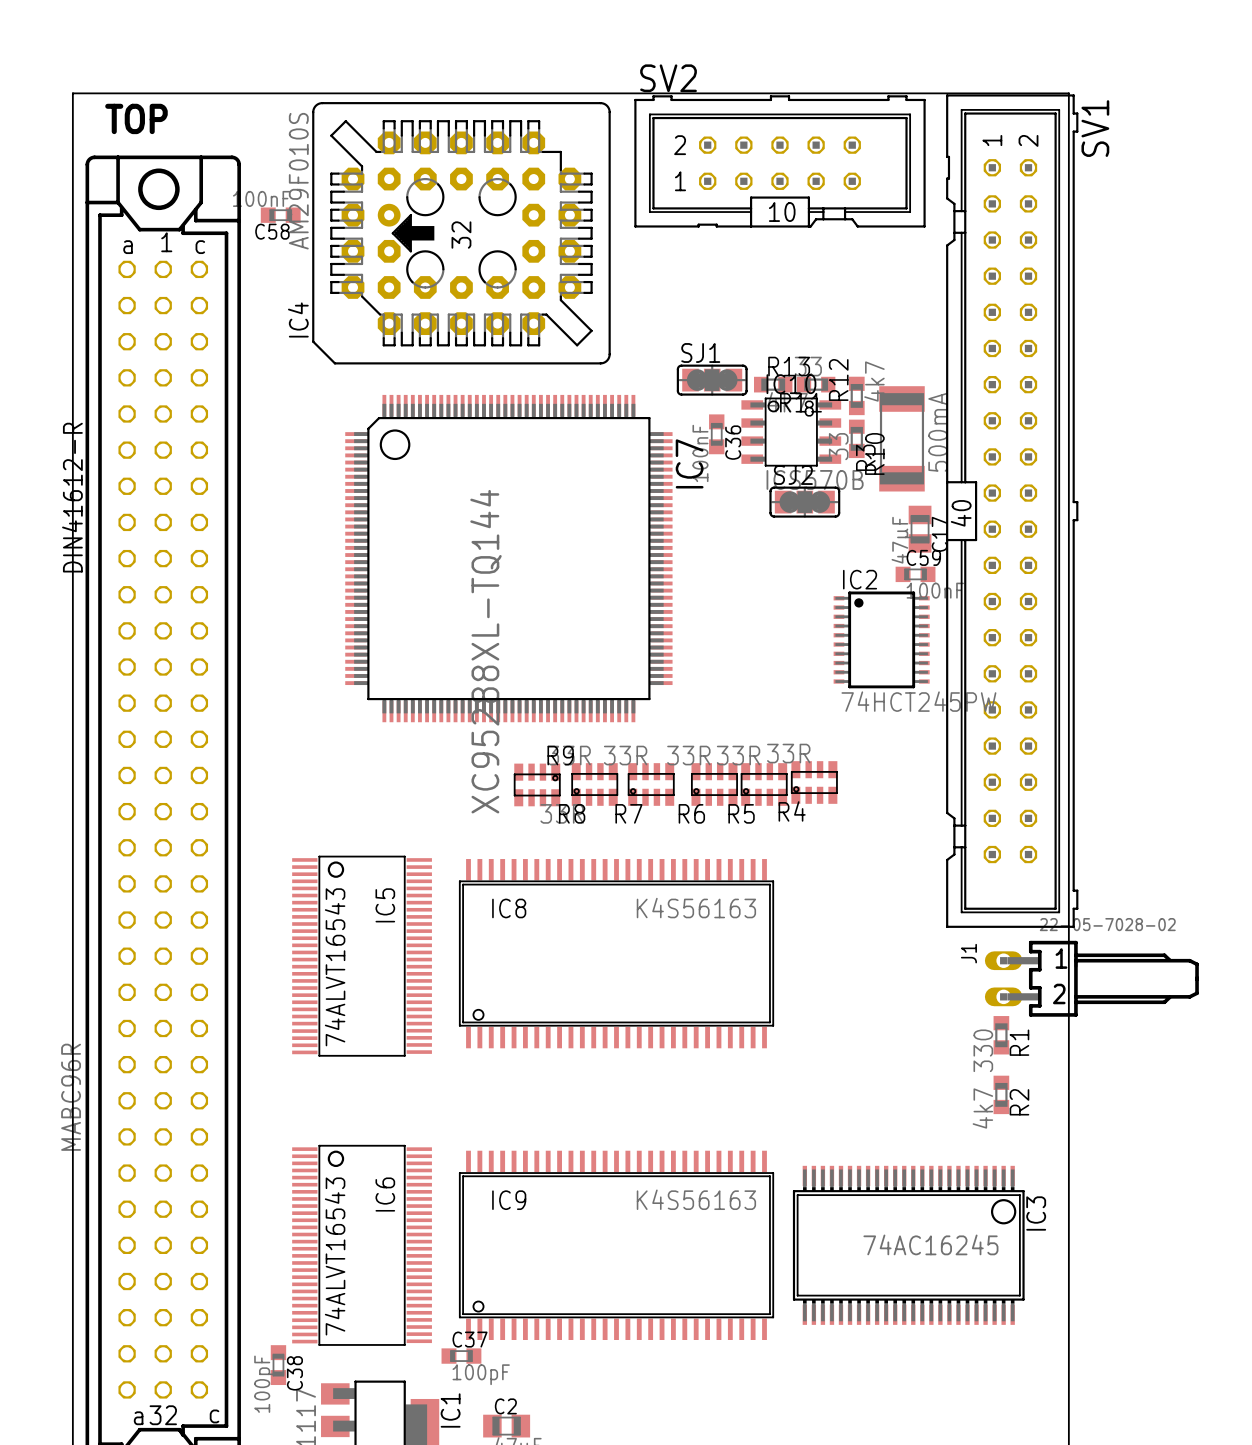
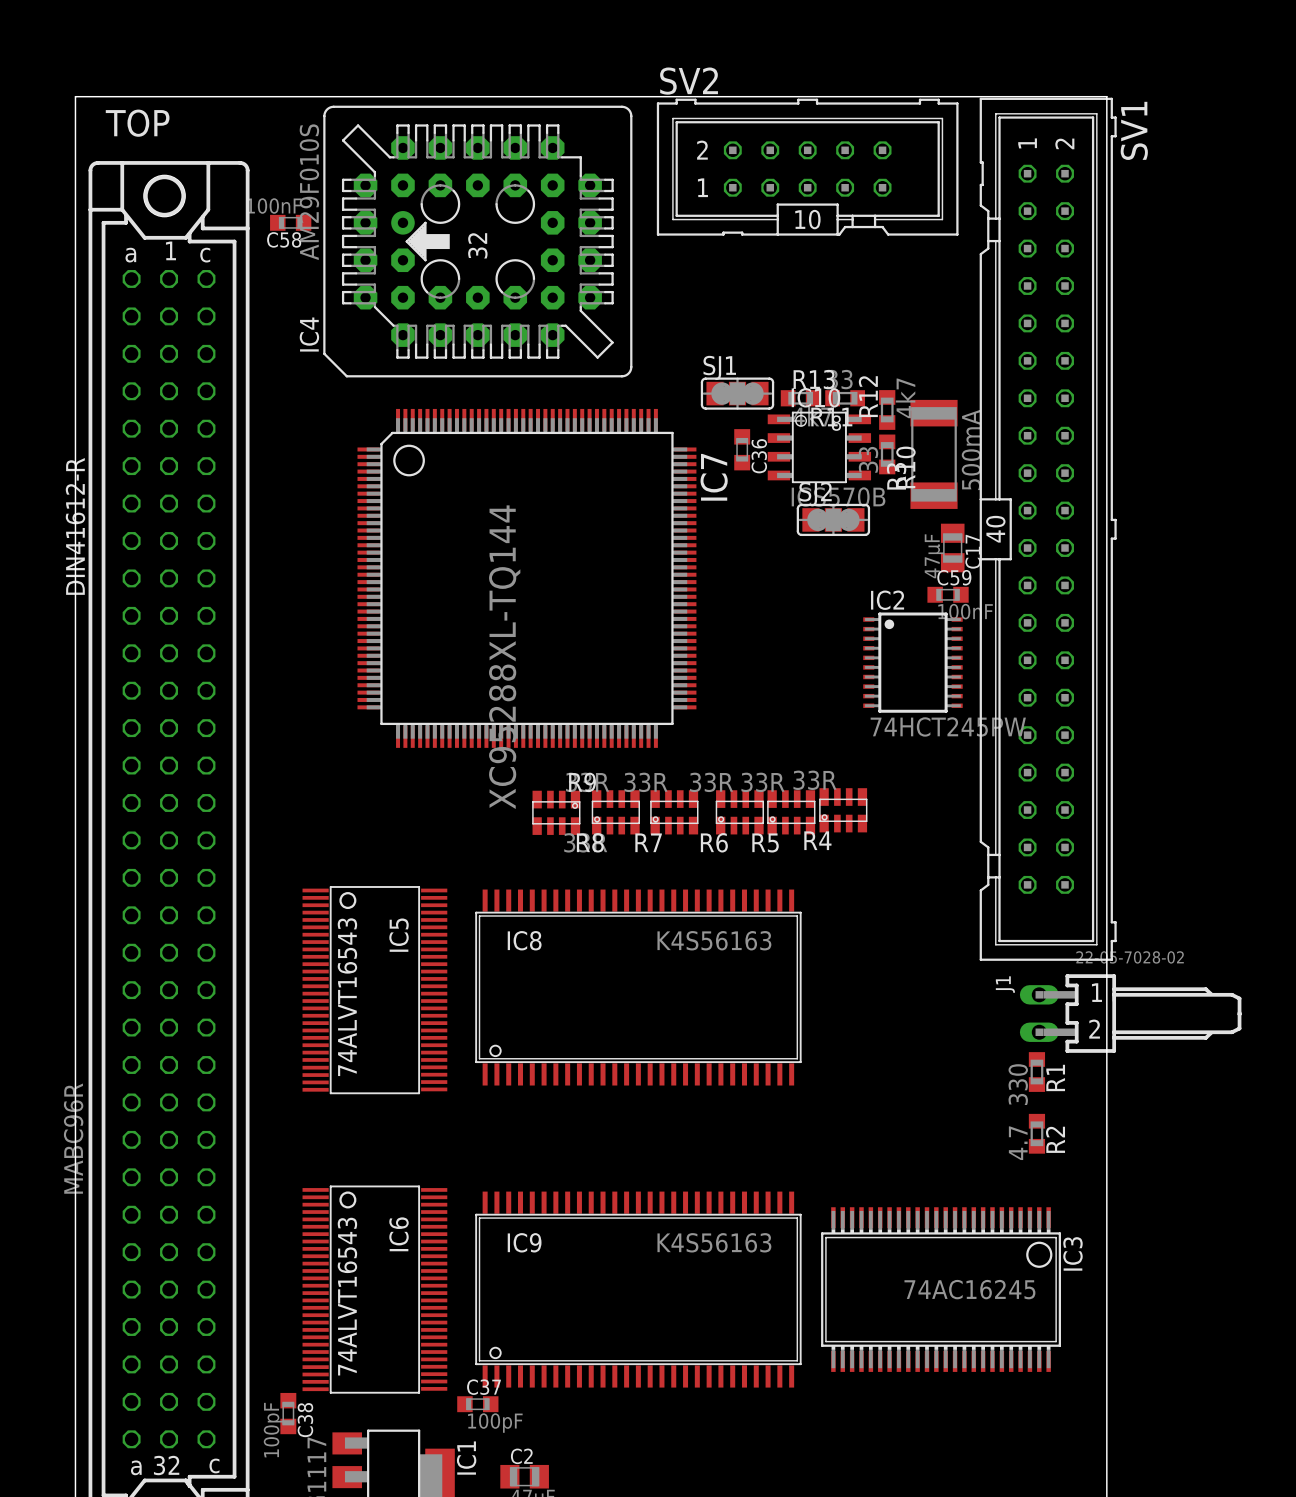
C36 value: 100nF (700, 453) -> none
R2 value: 4k7 (982, 1108) -> 4.7 (1018, 1143)

